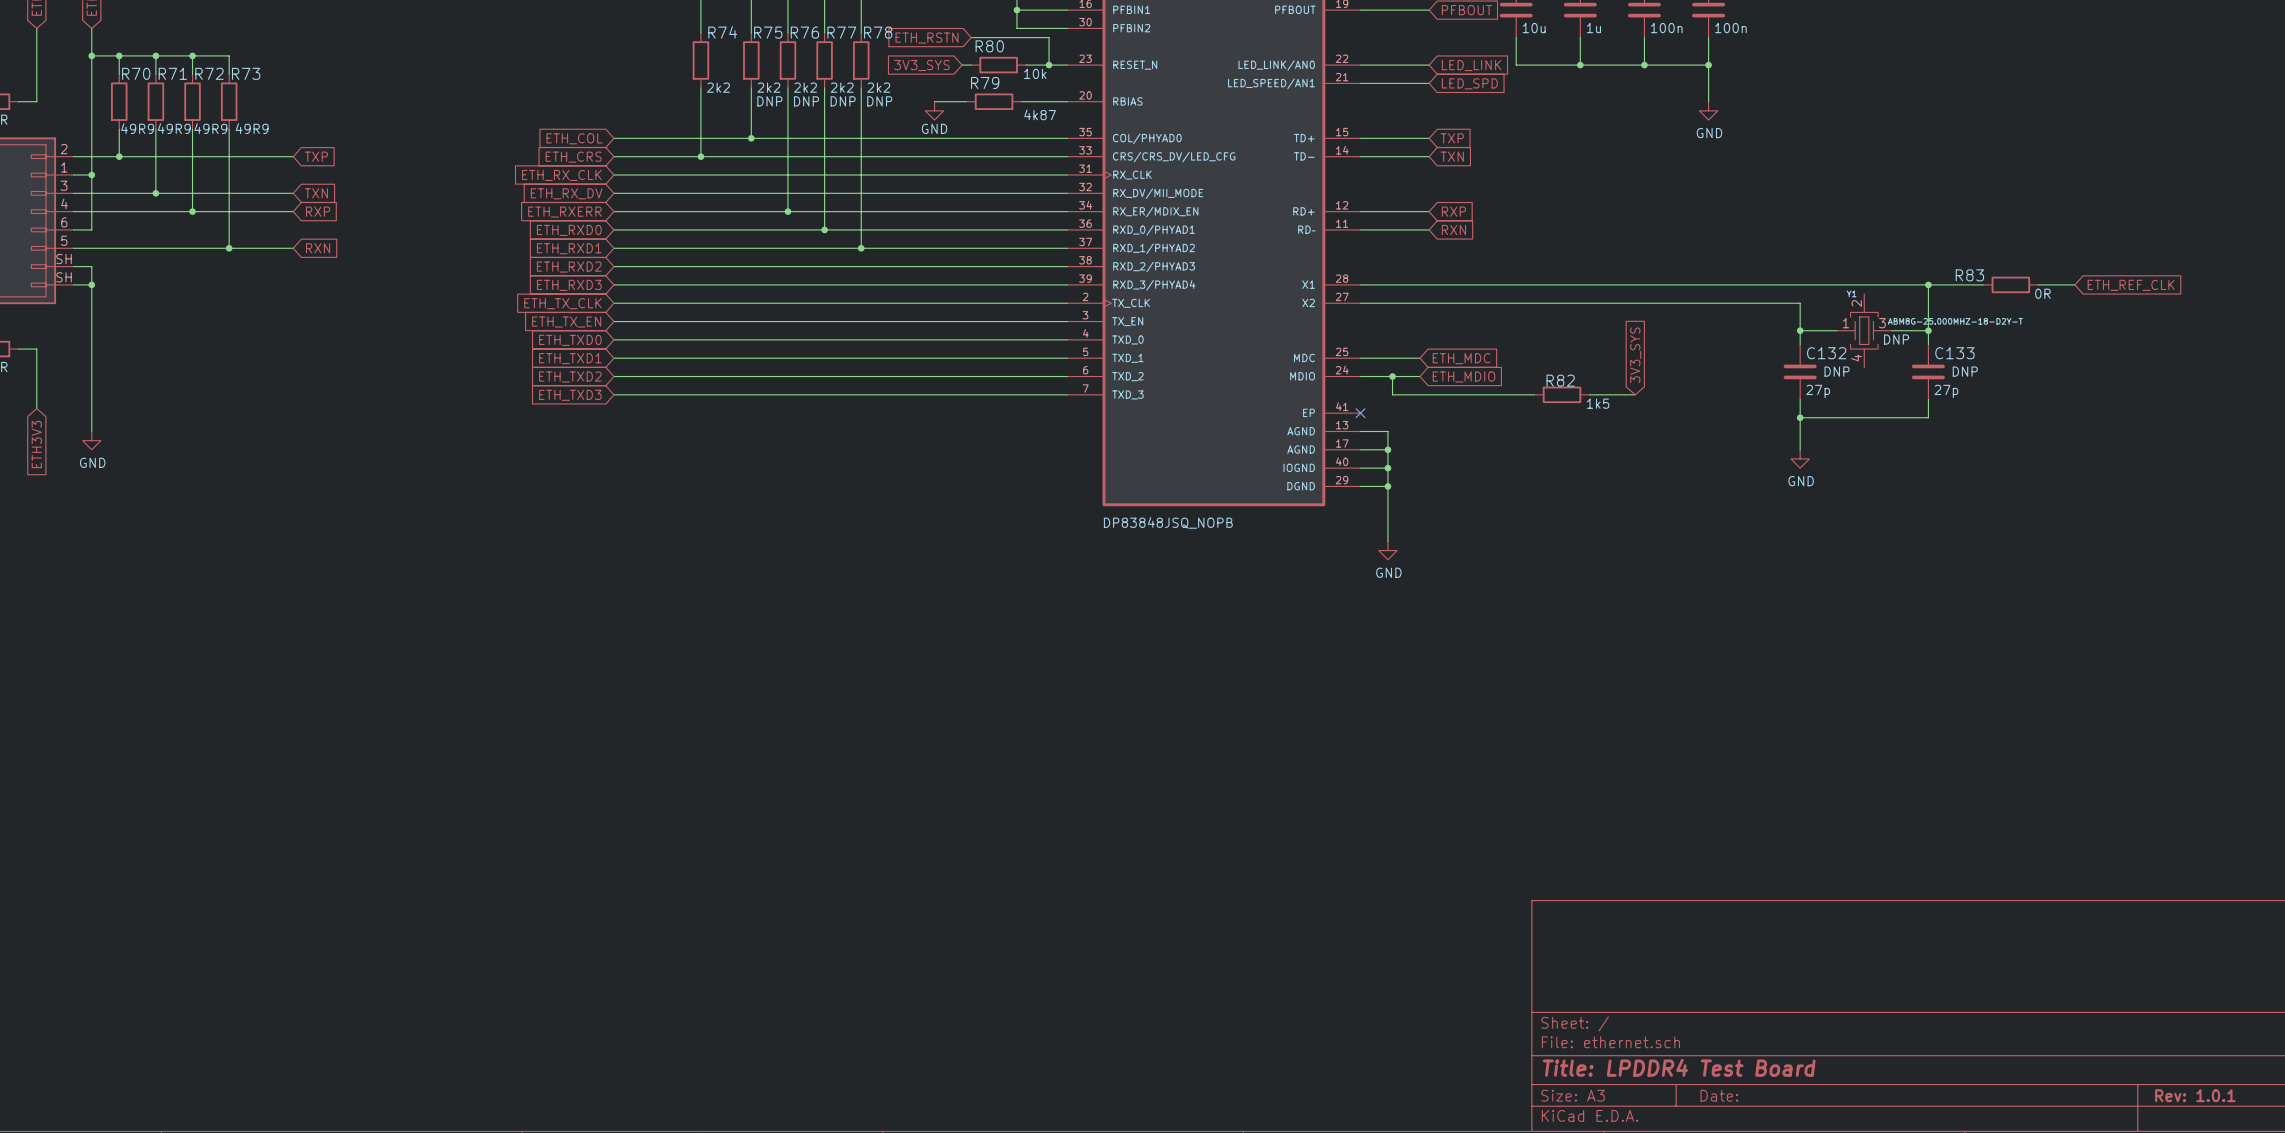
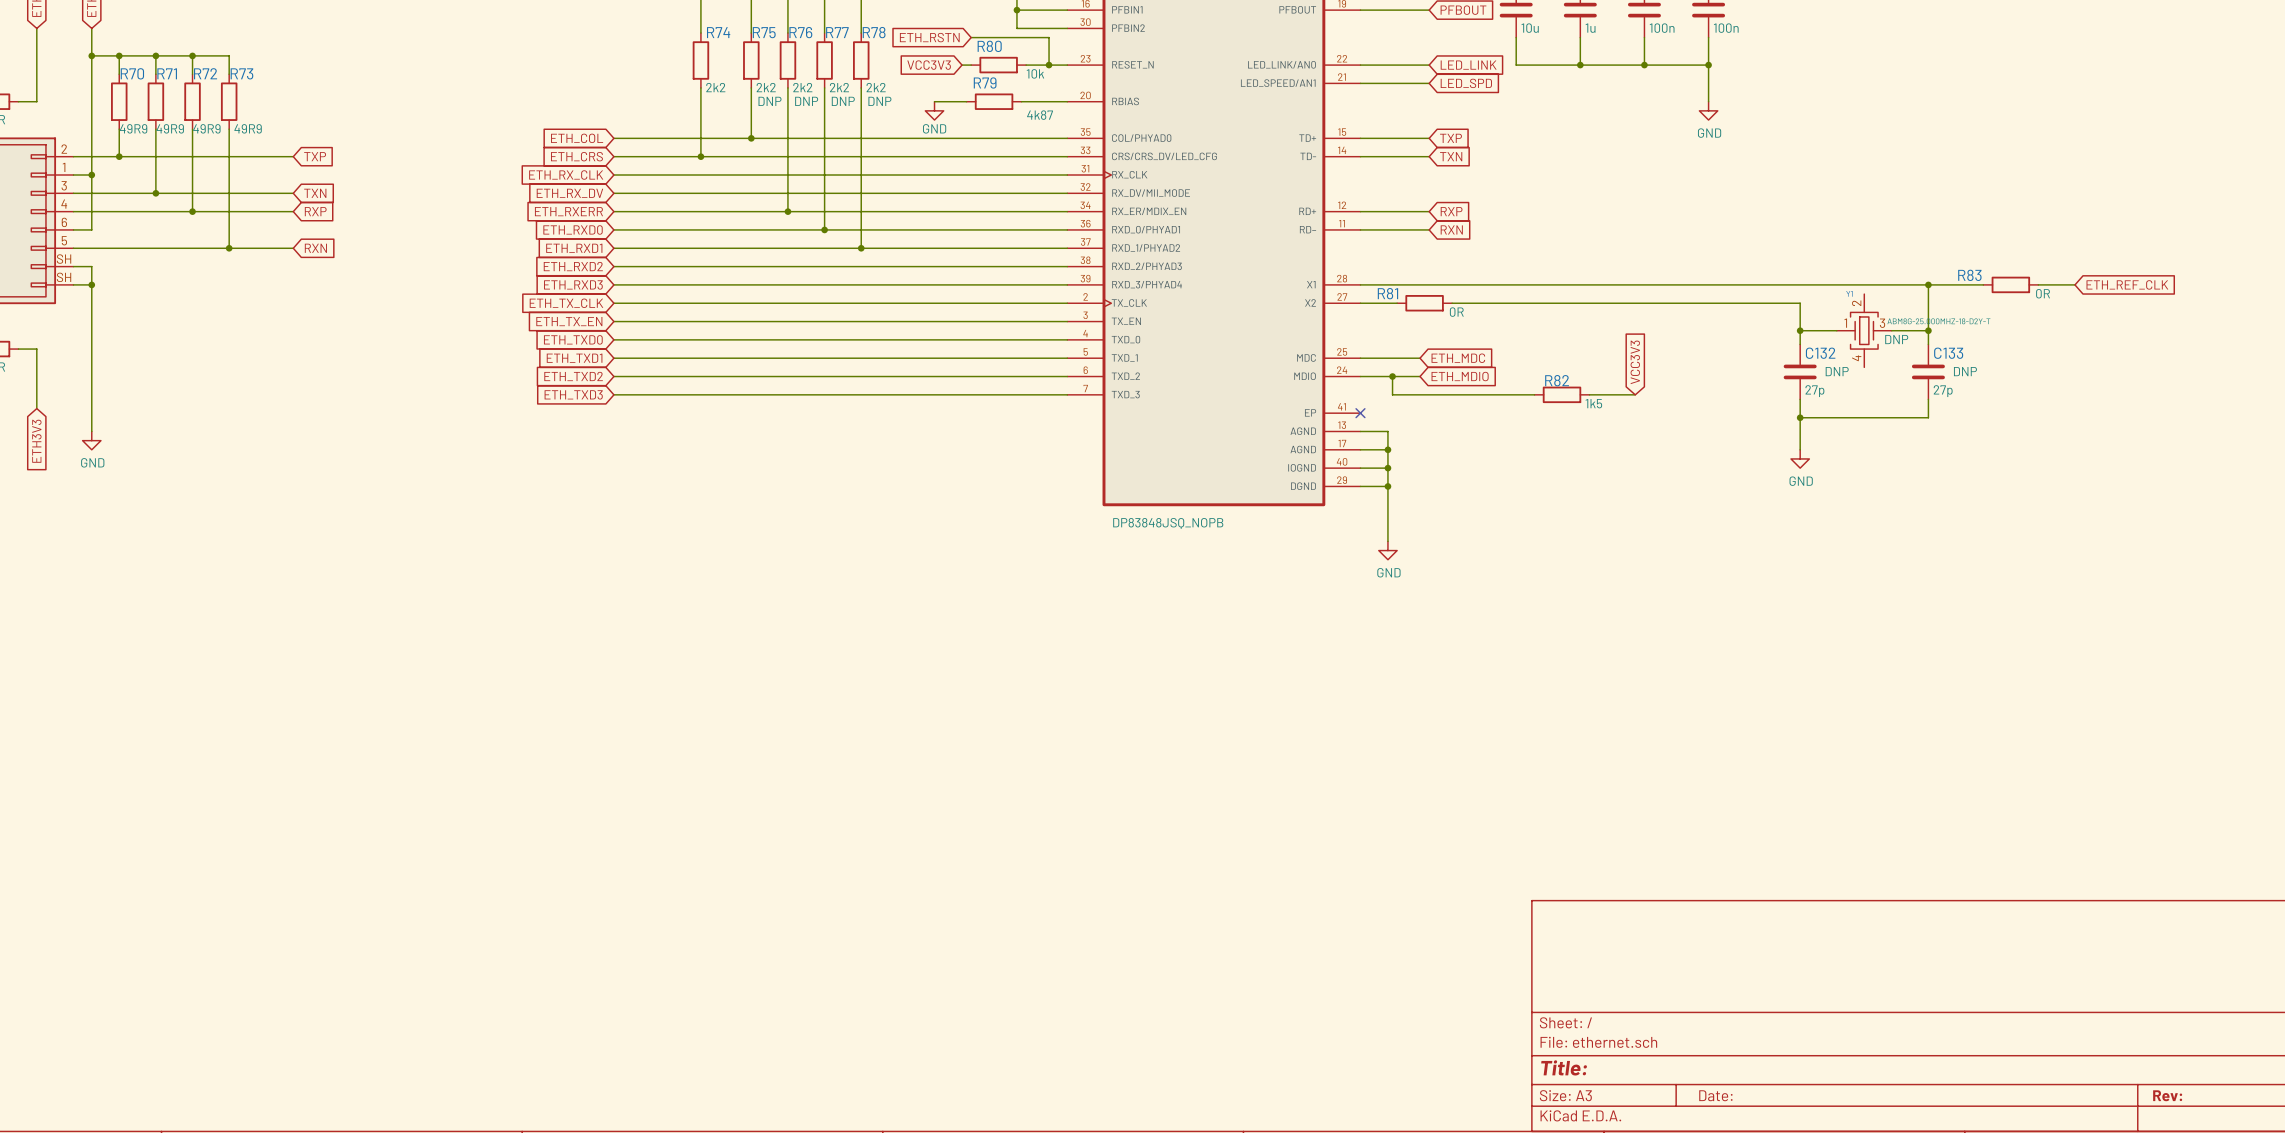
global label: 3V3_SYS (921, 65) -> VCC3V3 (929, 65)
wire: (1397, 303) (1452, 303) -> none
R81: none -> (1424, 303)
global label: 3V3_SYS (1635, 355) -> VCC3V3 (1635, 362)
title block: Title: LPDDR4 Test Board (1679, 1067) -> Title: (1564, 1067)
title block: Rev: 1.0.1 (2195, 1095) -> Rev: (2167, 1095)

